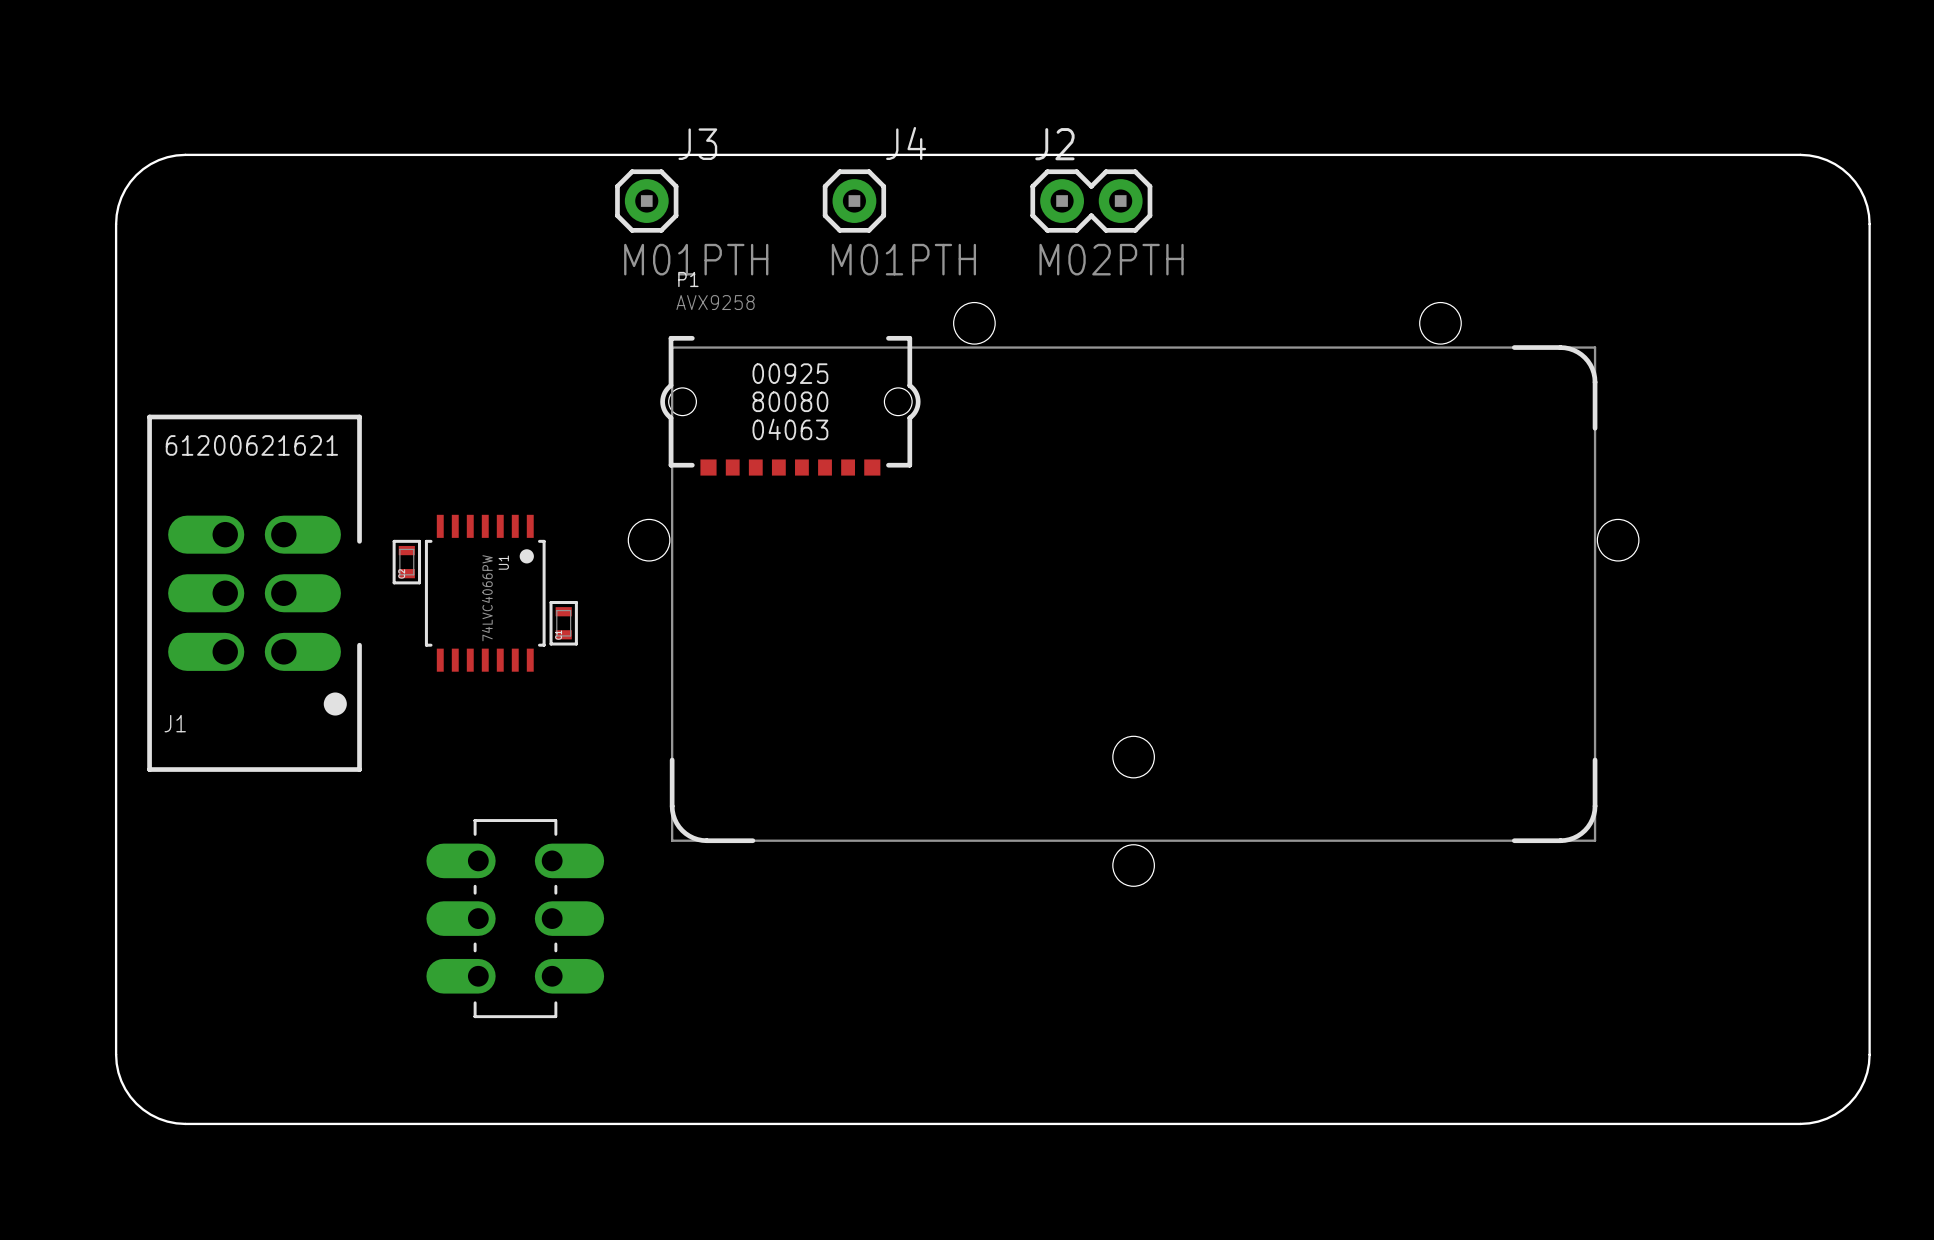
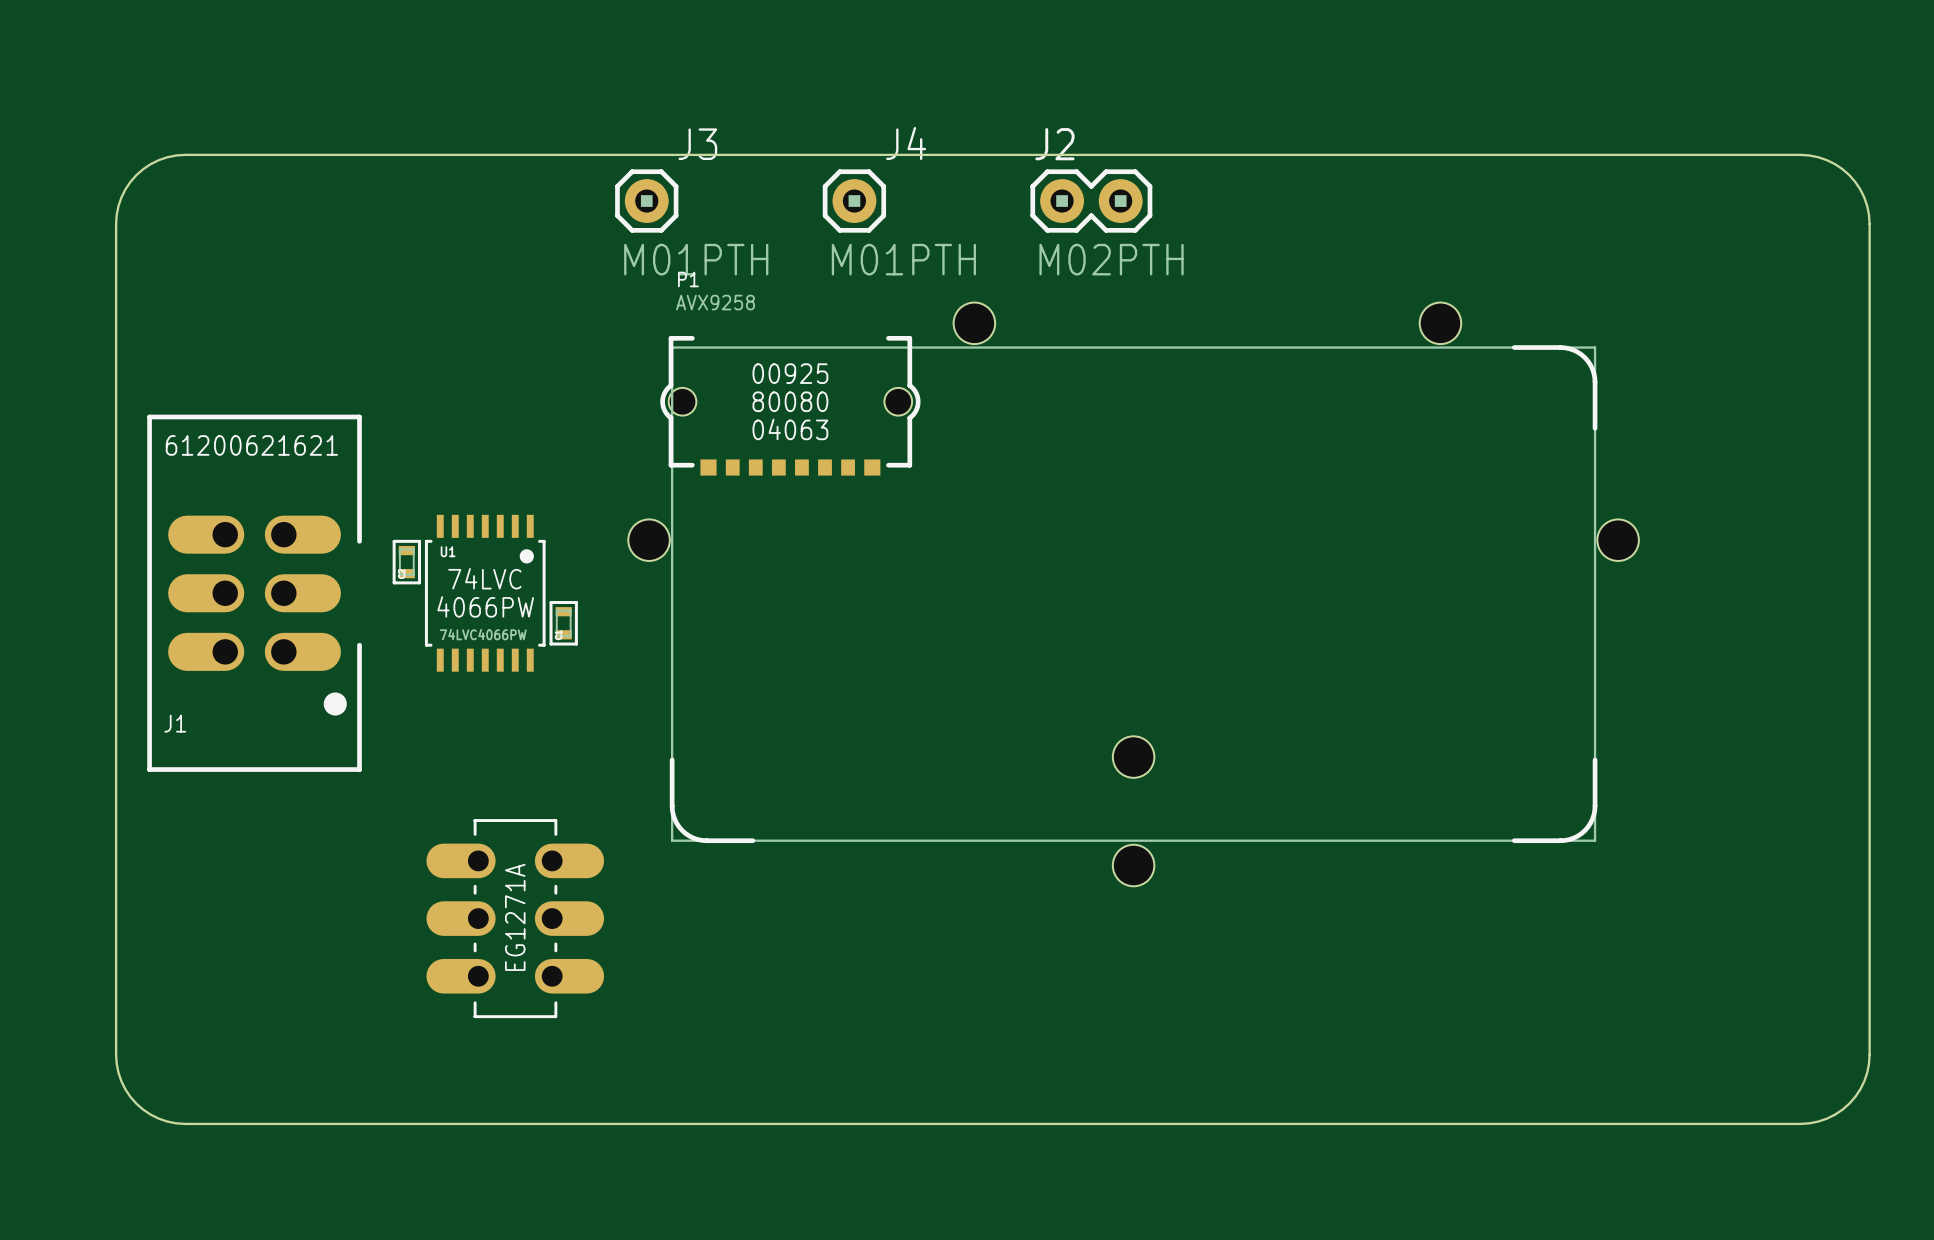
U1 name rotation: 0° (503, 562) -> 90° clockwise (448, 551)
U1 name position: U1 (503, 562) -> U1 (448, 551)
U1 text: none -> 74LVC (484, 578)
U1 value rotation: 0° (487, 598) -> 90° clockwise (483, 634)
U1 text: none -> 4066PW (485, 606)
part text: none -> EG1271A (515, 917)

